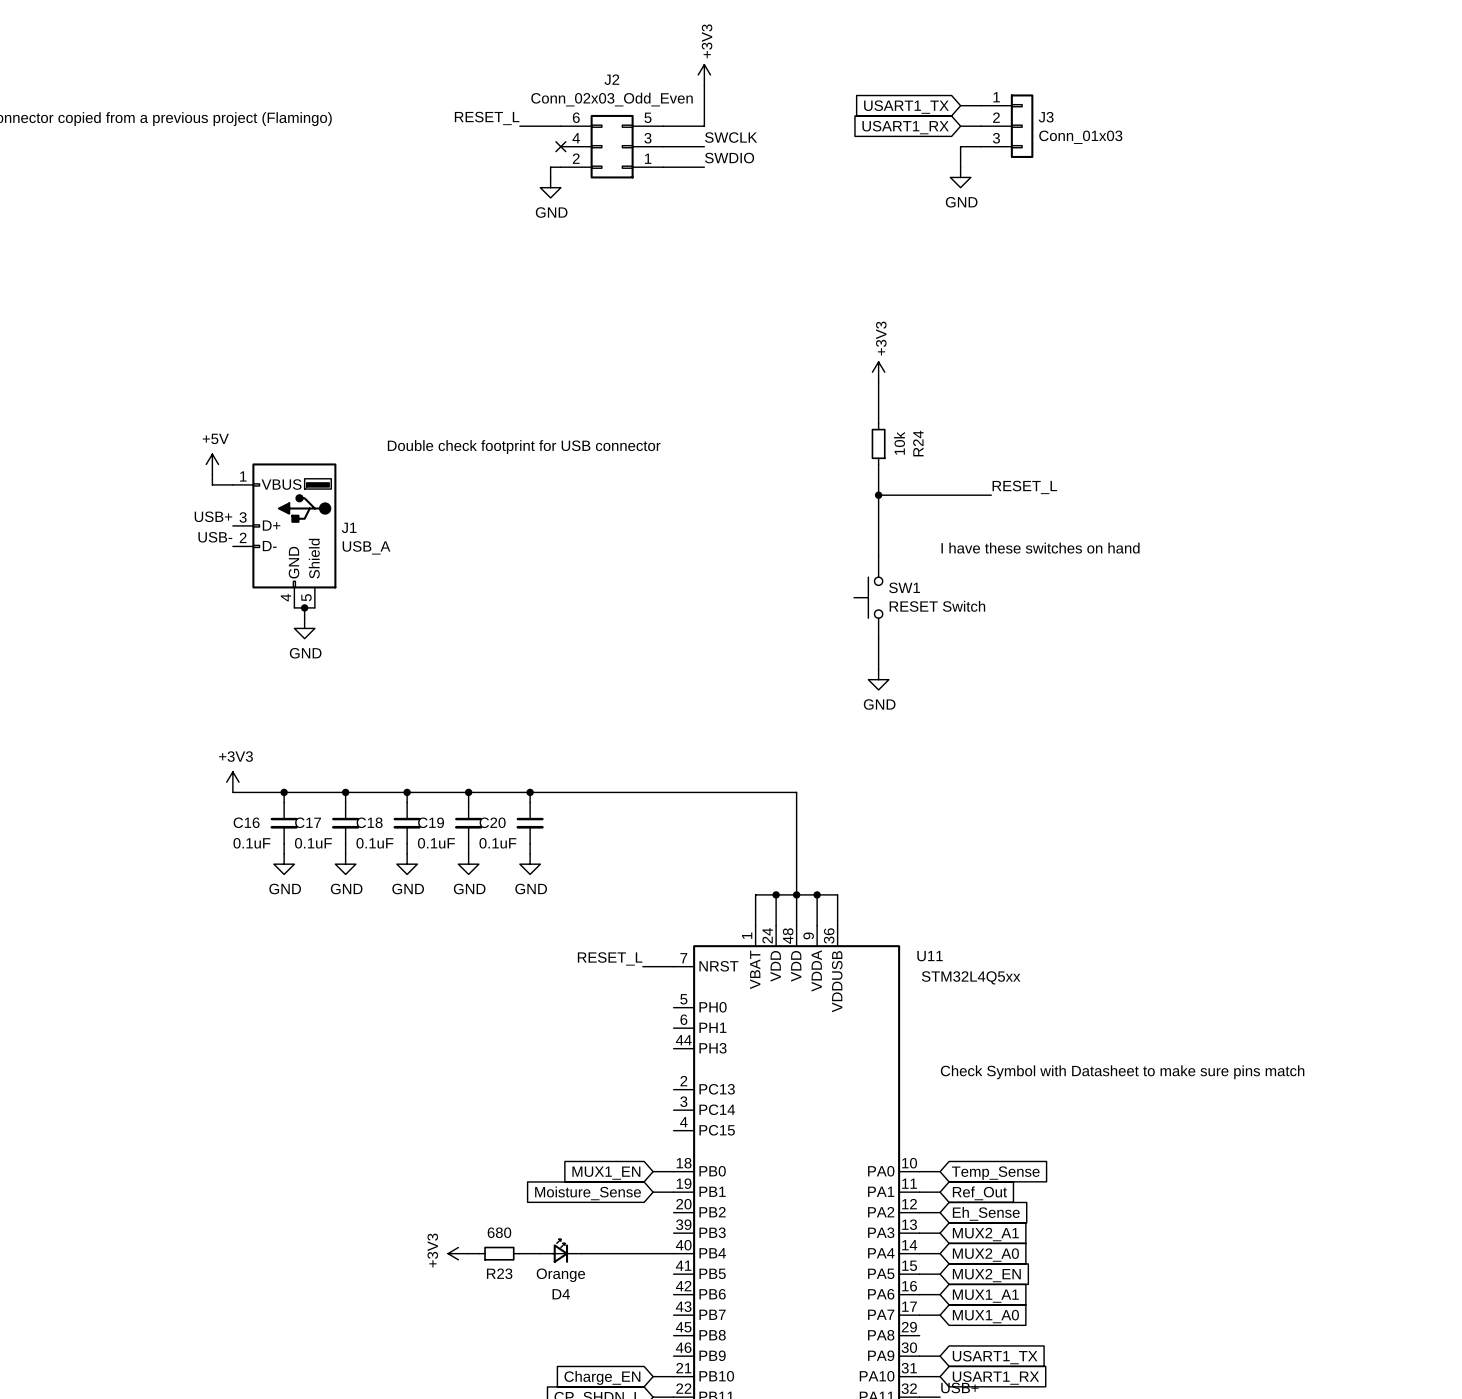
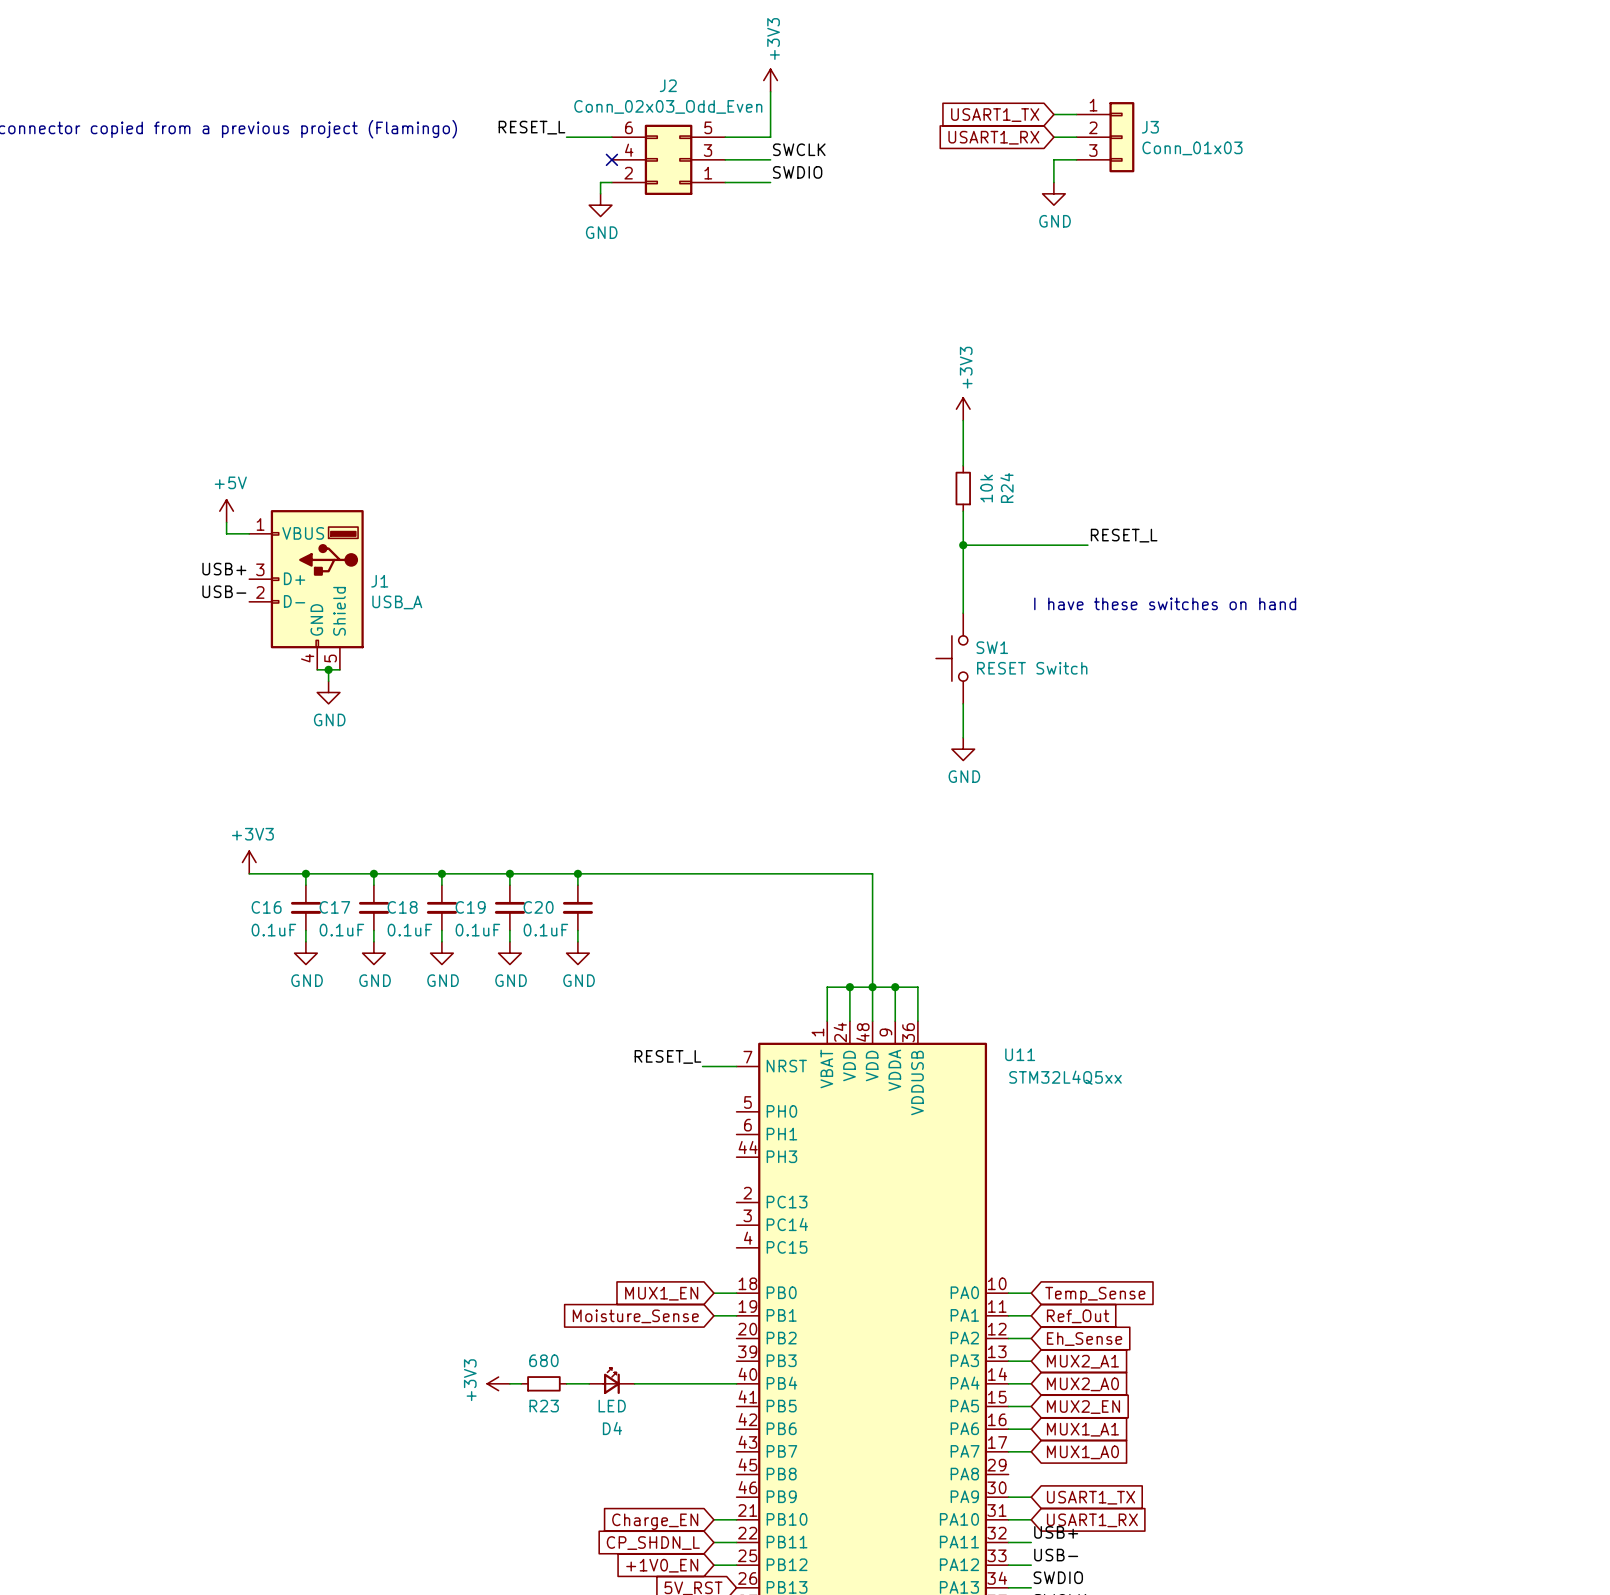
text: Double check footprint for USB connector (524, 447) -> none
text: Check Symbol with Datasheet to make sure pins match (1122, 1072) -> none
D4 value: Orange (560, 1275) -> LED (612, 1406)

